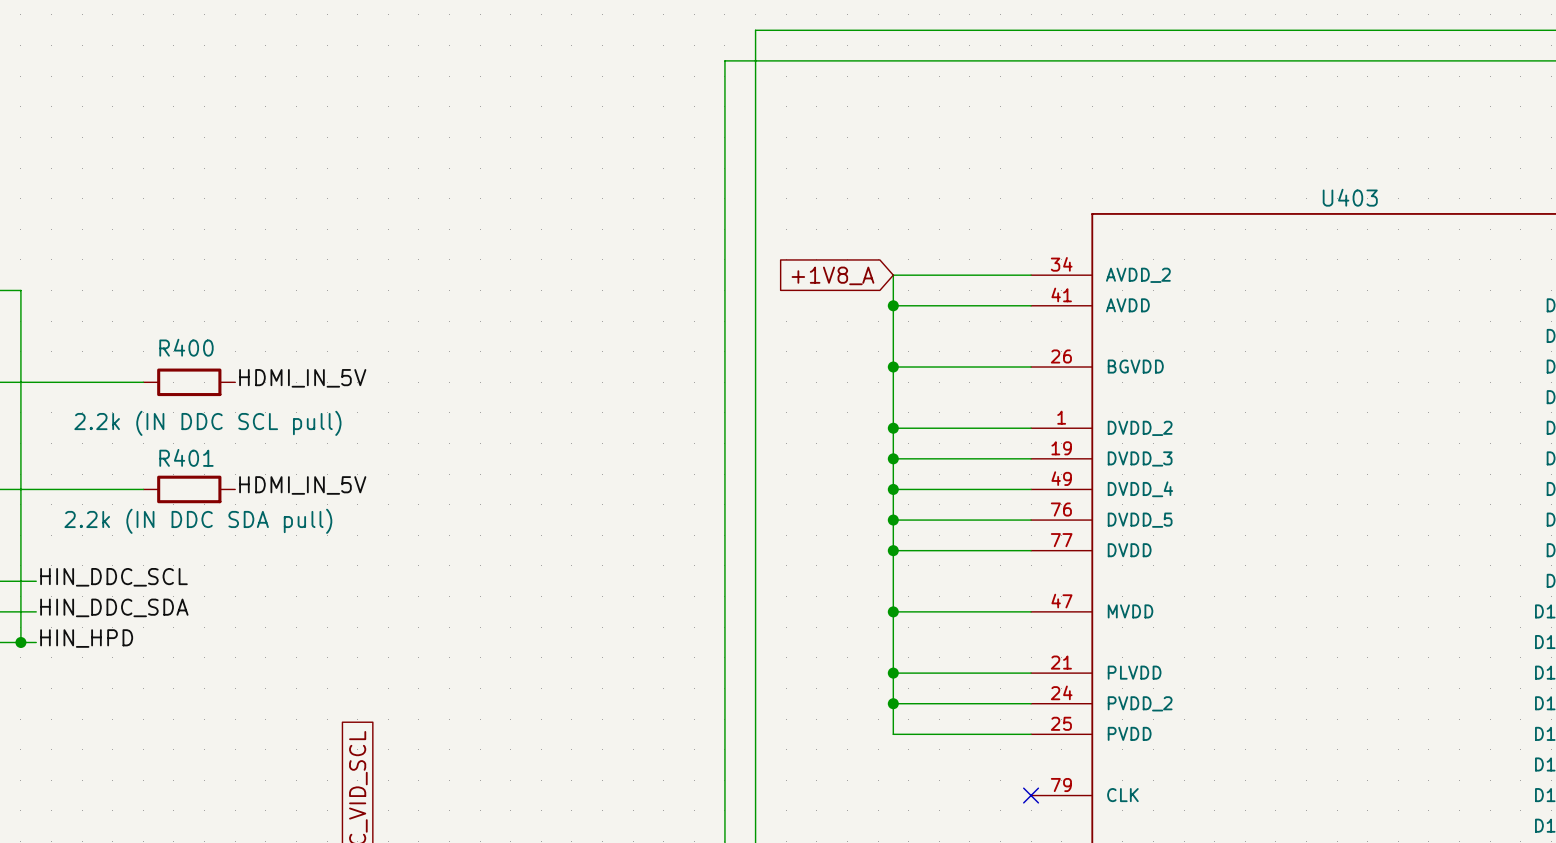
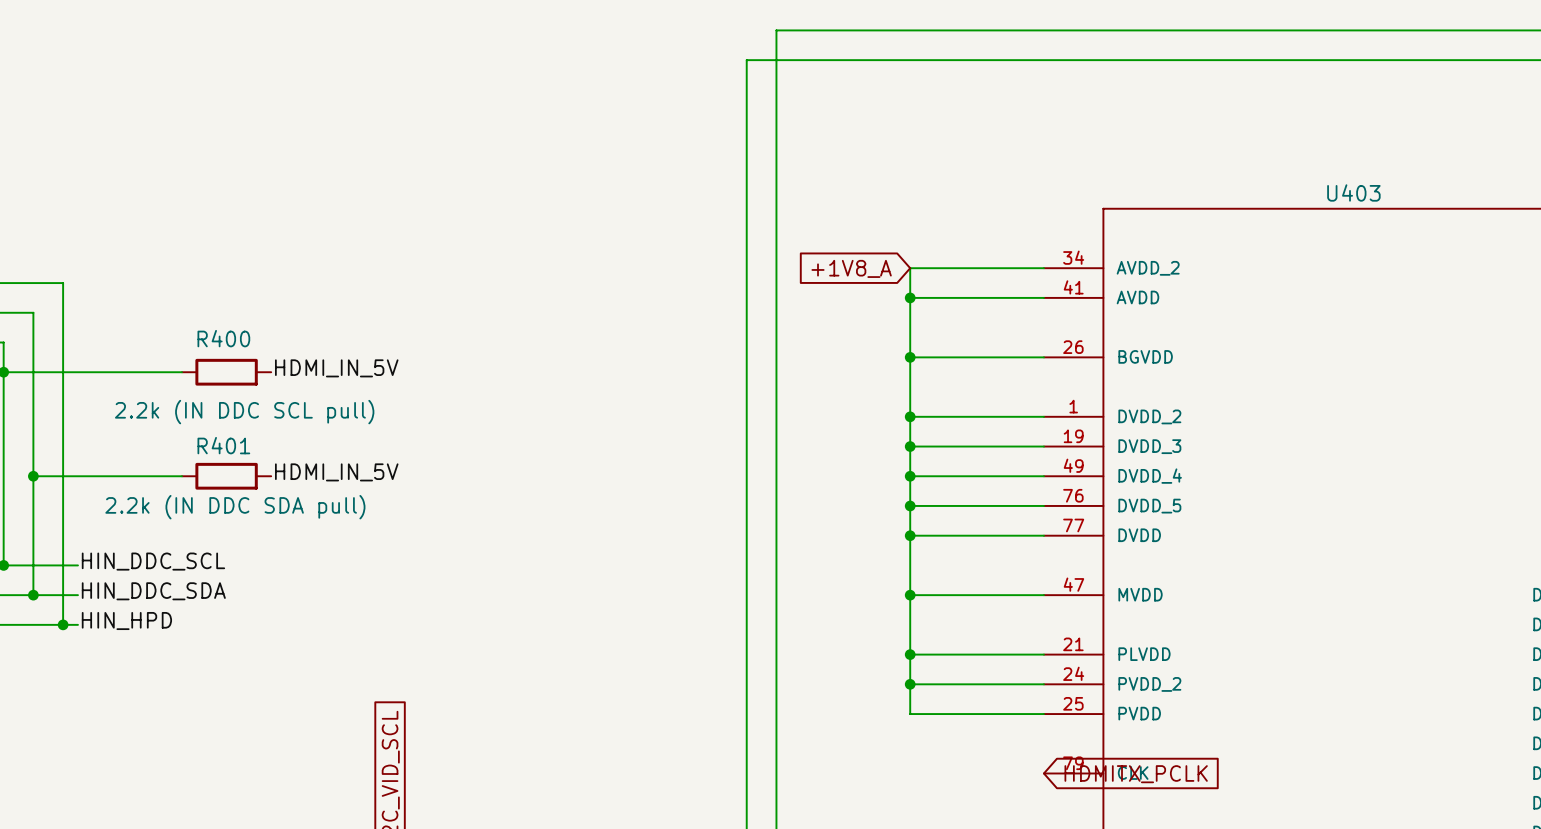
no-connect mark: (1031, 795) -> none
global label: none -> HDMITX_PCLK (1136, 774)

